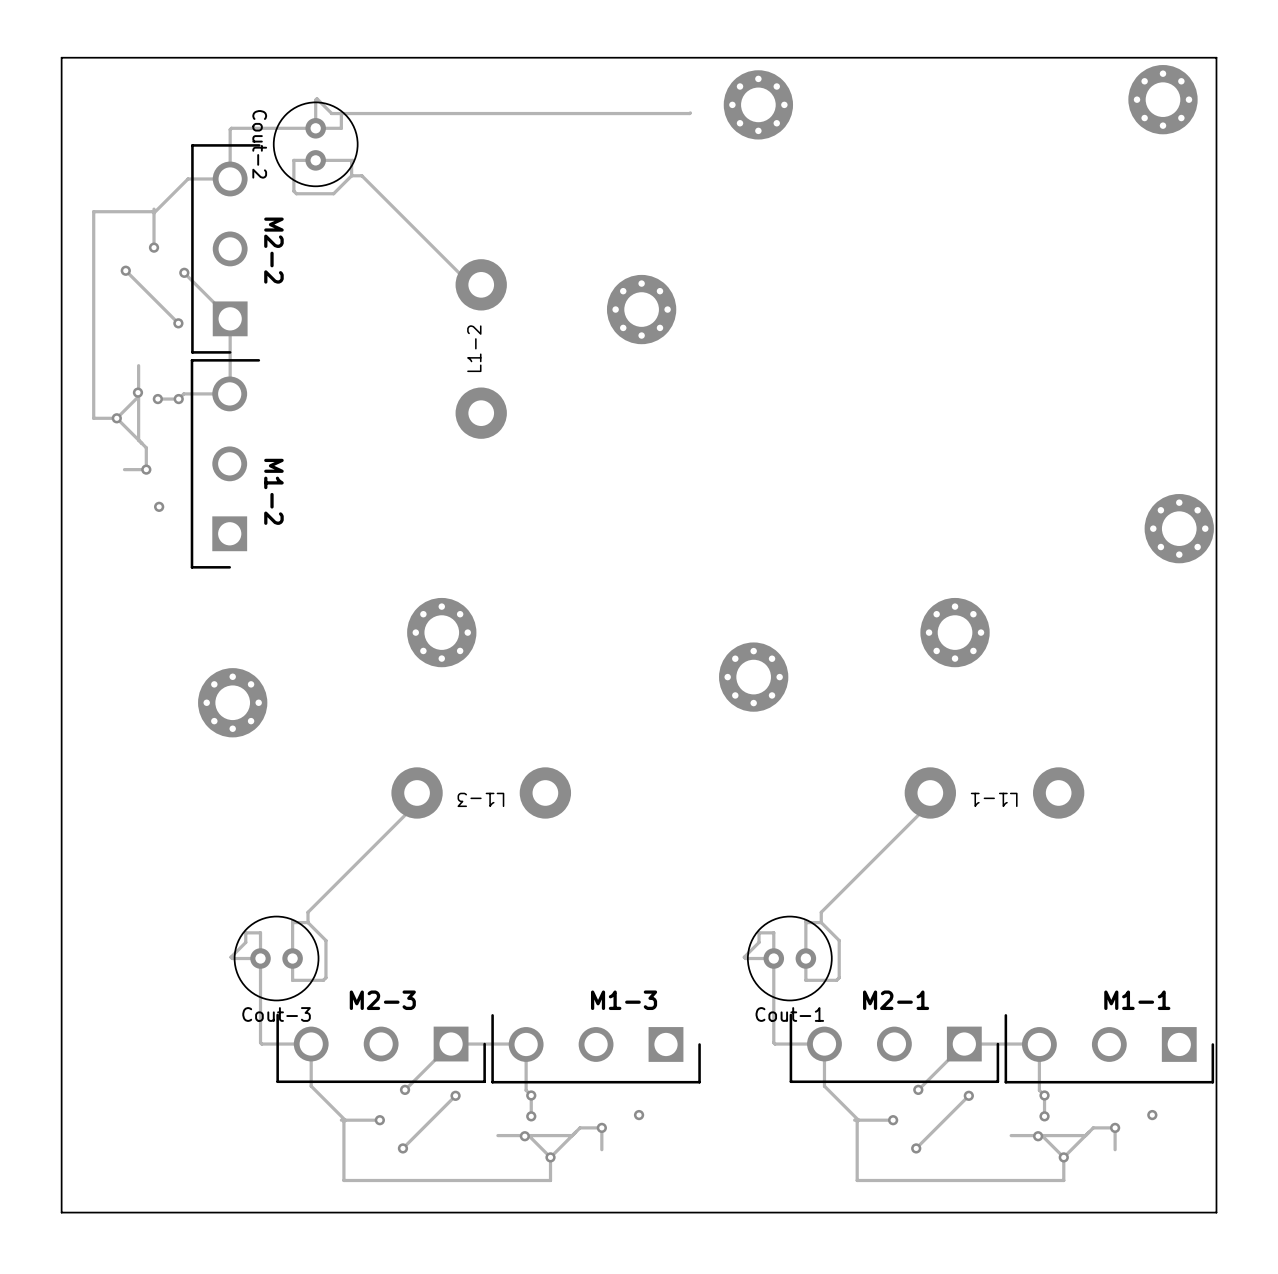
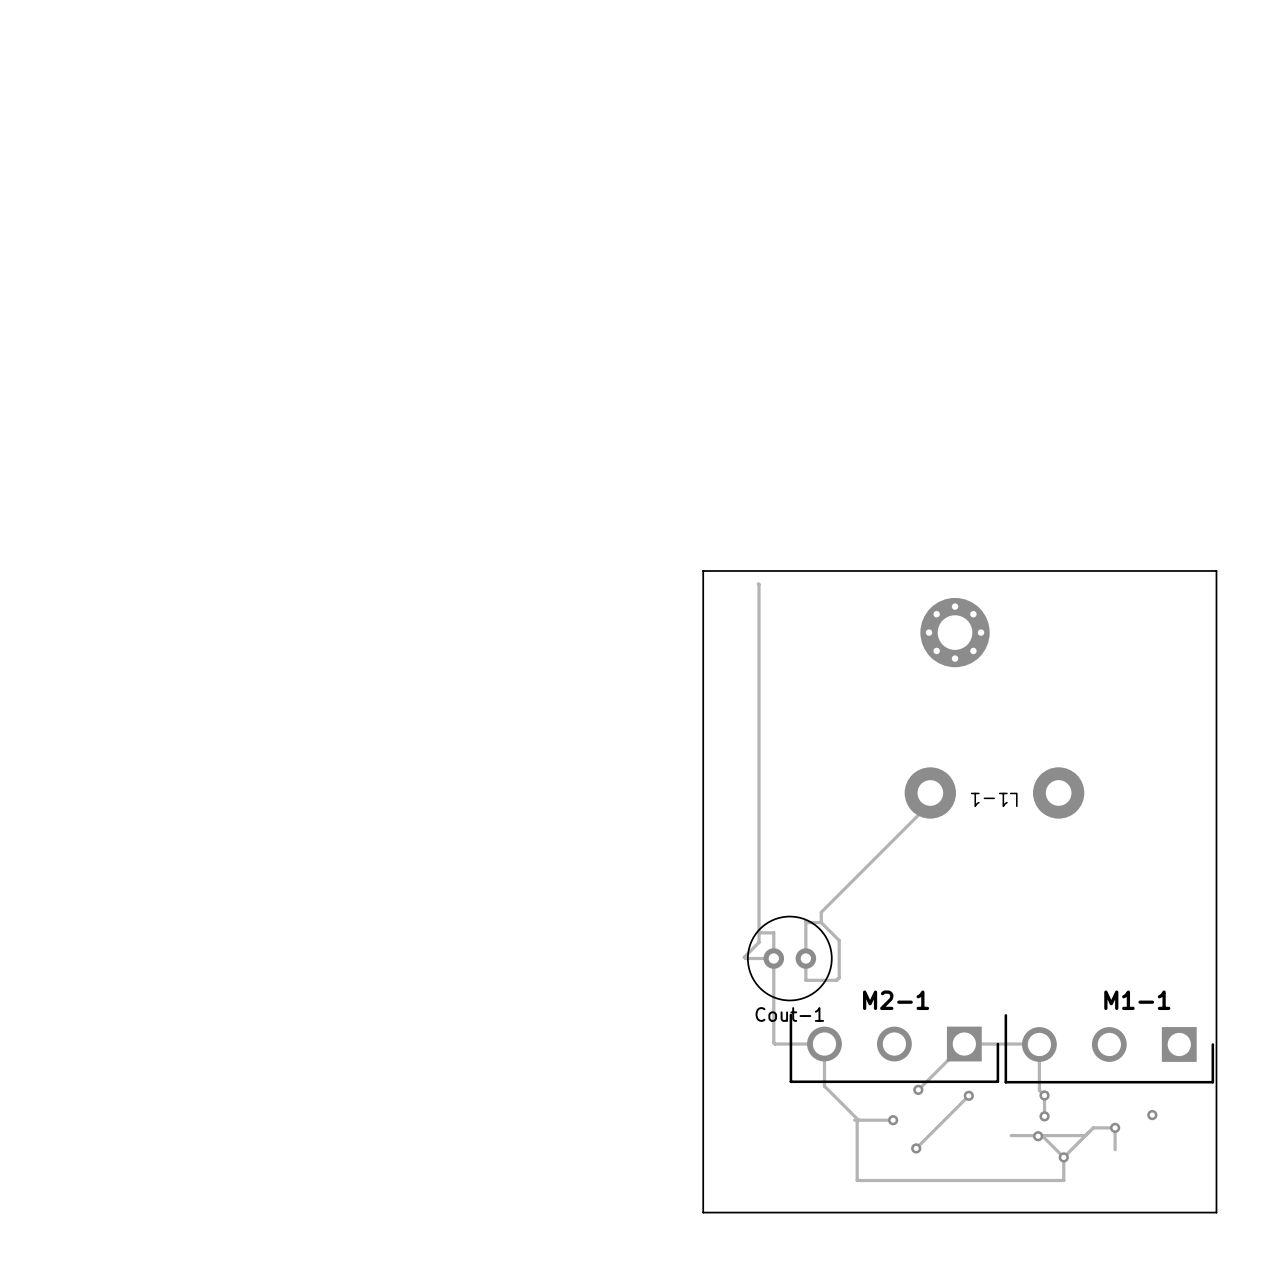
part: (1162, 99) -> none
part: (758, 104) -> none
track: (690, 112) (331, 113) (316, 98) (315, 128) -> none
track: (341, 113) (341, 128) (231, 128) (230, 178) (188, 178) (154, 212) (93, 211) (93, 418) (116, 418) -> none
Cout-2: (315, 144) -> none
track: (351, 175) (352, 160) (293, 160) (293, 191) (296, 193) (333, 193) (351, 175) -> none
track: (351, 175) (361, 175) (481, 295) -> none
track: (154, 209) (154, 247) -> none
via: (154, 247) -> none
M2-2: (225, 248) -> none
track: (125, 270) (176, 321) -> none
via: (125, 270) -> none
via: (184, 272) -> none
track: (184, 273) (230, 318) (229, 393) -> none
part: (641, 309) -> none
via: (178, 323) -> none
L1-2: (481, 349) -> none
track: (138, 365) (137, 392) -> none
track: (137, 392) (137, 397) (116, 418) -> none
track: (137, 392) (138, 440) -> none
via: (137, 392) -> none
track: (222, 393) (183, 393) (178, 399) (157, 399) -> none
via: (157, 399) -> none
via: (178, 399) -> none
track: (116, 418) (146, 447) (146, 469) (124, 469) -> none
via: (116, 418) -> none
M1-2: (225, 463) -> none
via: (146, 469) -> none
via: (159, 506) -> none
part: (1179, 528) -> none
board edge: (1216, 570) (1216, 57) (61, 57) (61, 1212) (703, 1212) -> (1216, 570) (703, 570) (703, 1212)
track: none -> (758, 583) (759, 932)
part: (441, 632) -> none
part: (753, 677) -> none
part: (232, 702) -> none
track: (427, 792) (307, 912) (307, 922) -> none
L1-3: (481, 792) -> none
track: (307, 922) (292, 921) (292, 980) (323, 980) (325, 977) (325, 940) (307, 922) -> none
track: (260, 958) (232, 958) (231, 957) (245, 942) (245, 932) (260, 932) (260, 1042) (311, 1044) (311, 1086) (345, 1120) (343, 1180) (550, 1180) (550, 1157) -> none
Cout-3: (276, 958) -> none
track: (526, 1044) (451, 1044) (405, 1089) -> none
M2-3: (381, 1048) -> none
M1-3: (596, 1048) -> none
track: (526, 1052) (526, 1090) (531, 1095) (531, 1116) -> none
via: (405, 1089) -> none
via: (455, 1095) -> none
via: (531, 1095) -> none
track: (453, 1097) (402, 1148) -> none
via: (639, 1115) -> none
via: (531, 1116) -> none
track: (379, 1120) (341, 1120) -> none
via: (379, 1120) -> none
via: (601, 1127) -> none
track: (497, 1135) (524, 1136) -> none
track: (572, 1135) (524, 1136) -> none
track: (524, 1136) (529, 1136) (550, 1157) -> none
via: (524, 1136) -> none
via: (402, 1148) -> none
track: (601, 1149) (601, 1127) (580, 1127) (550, 1157) -> none
via: (550, 1157) -> none

